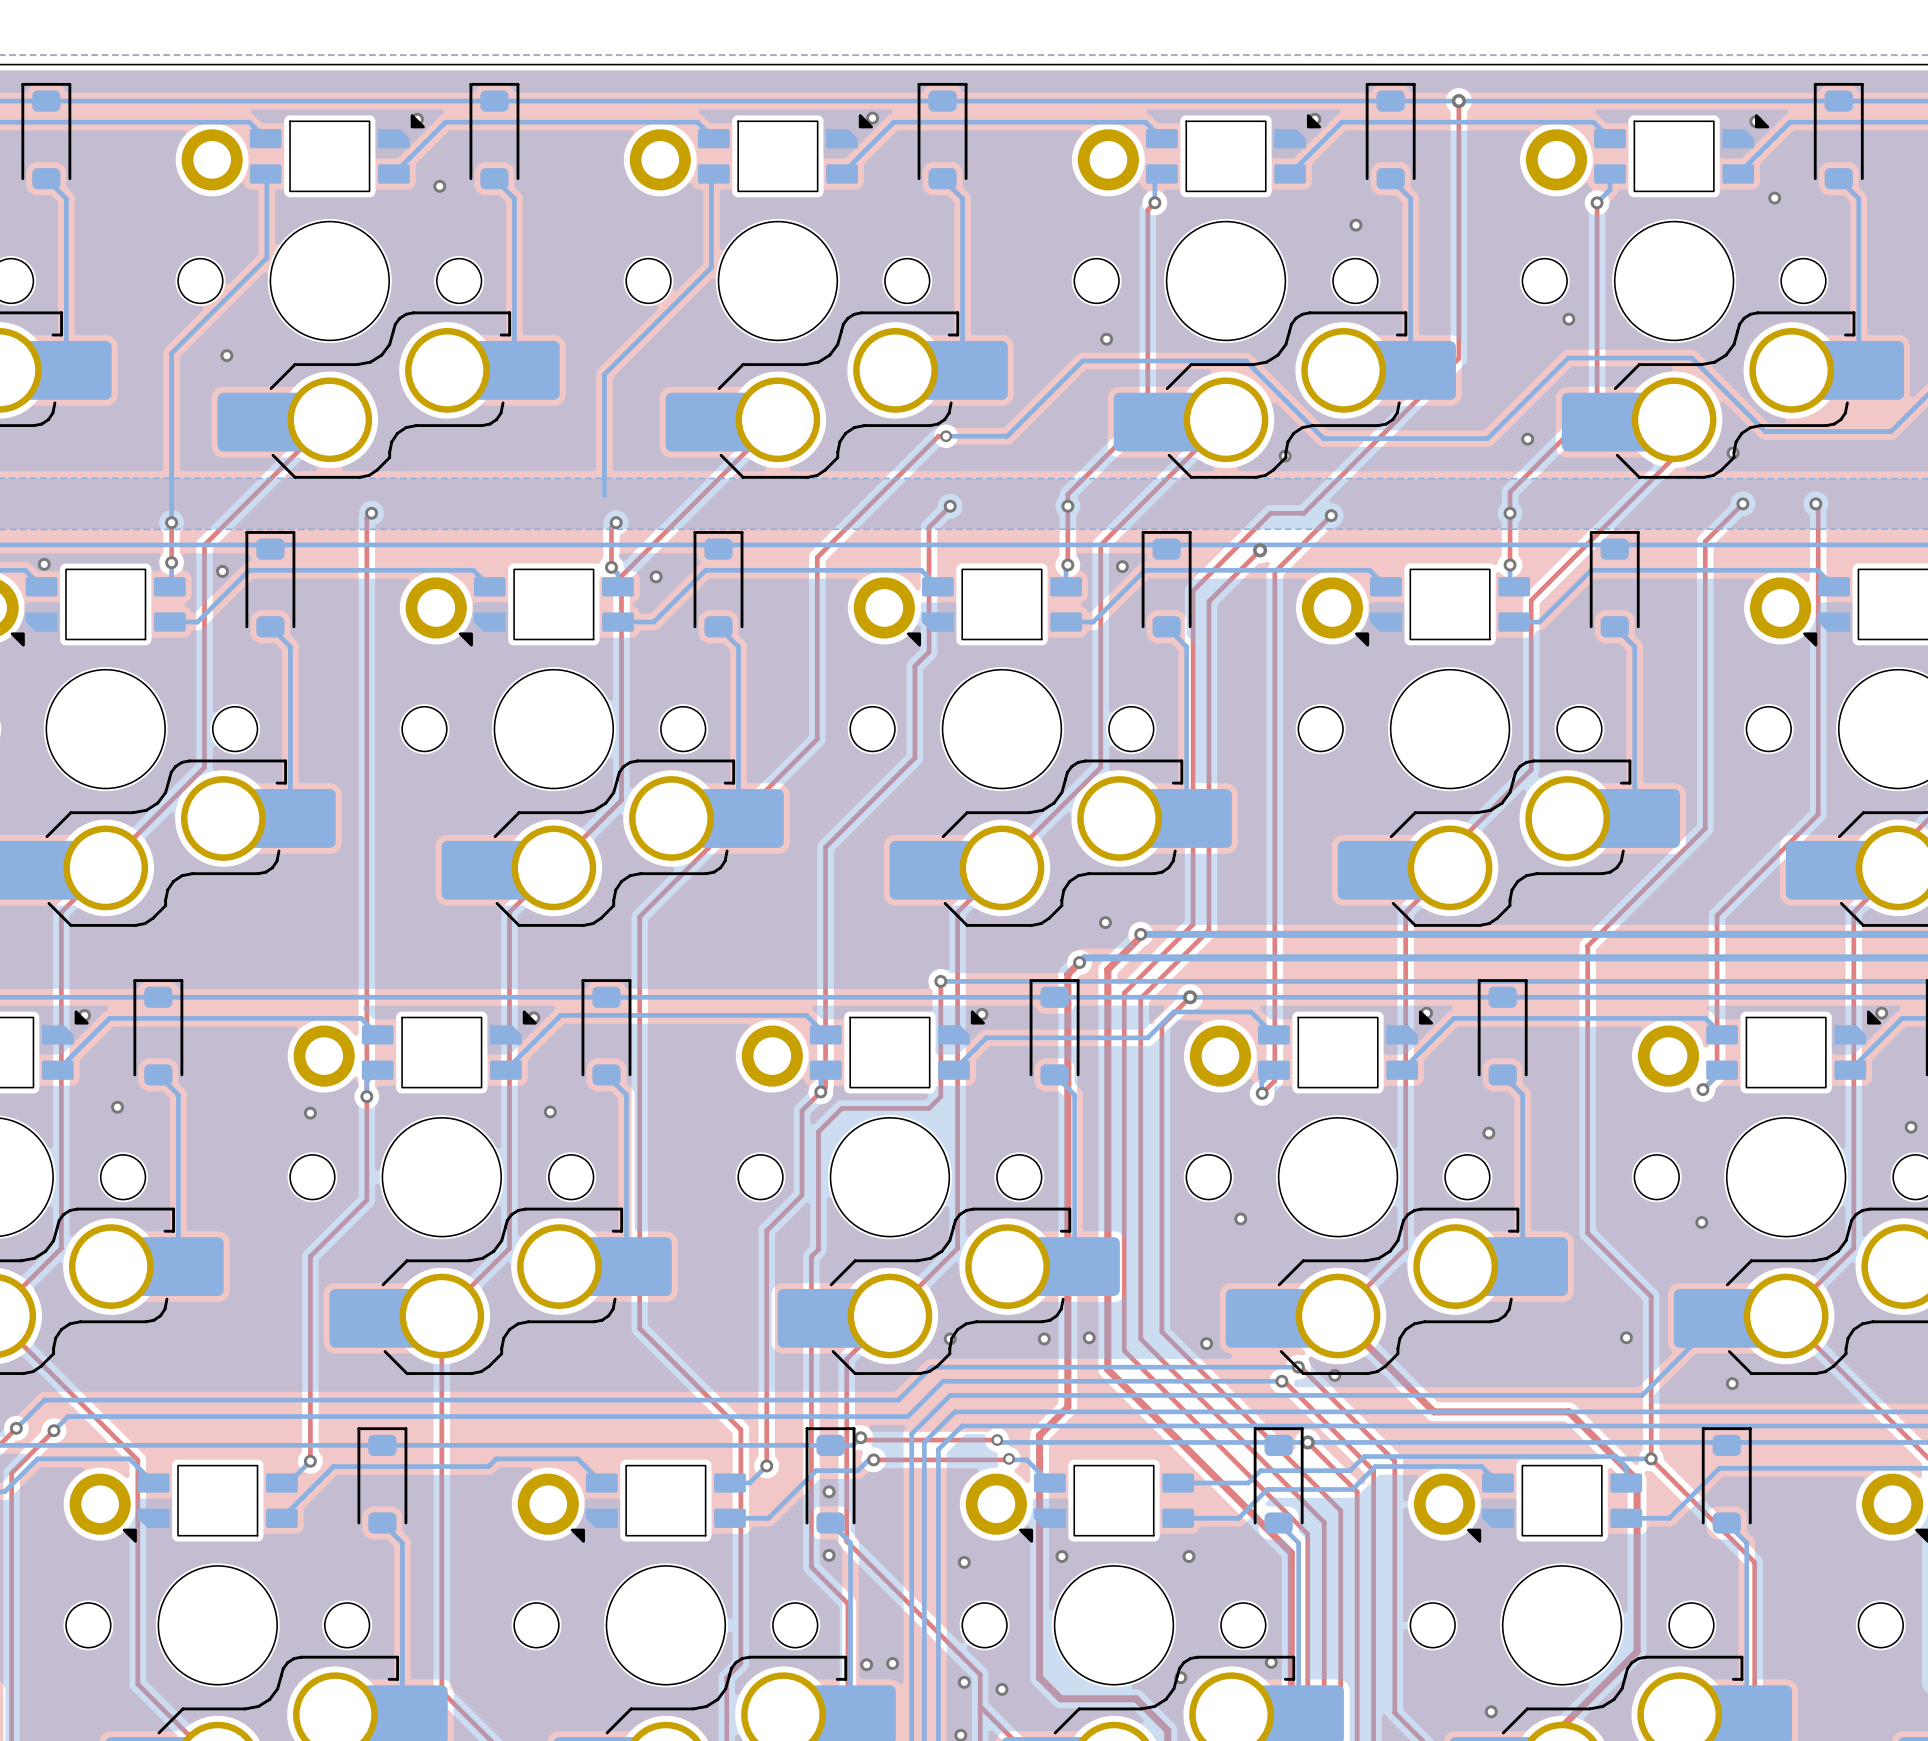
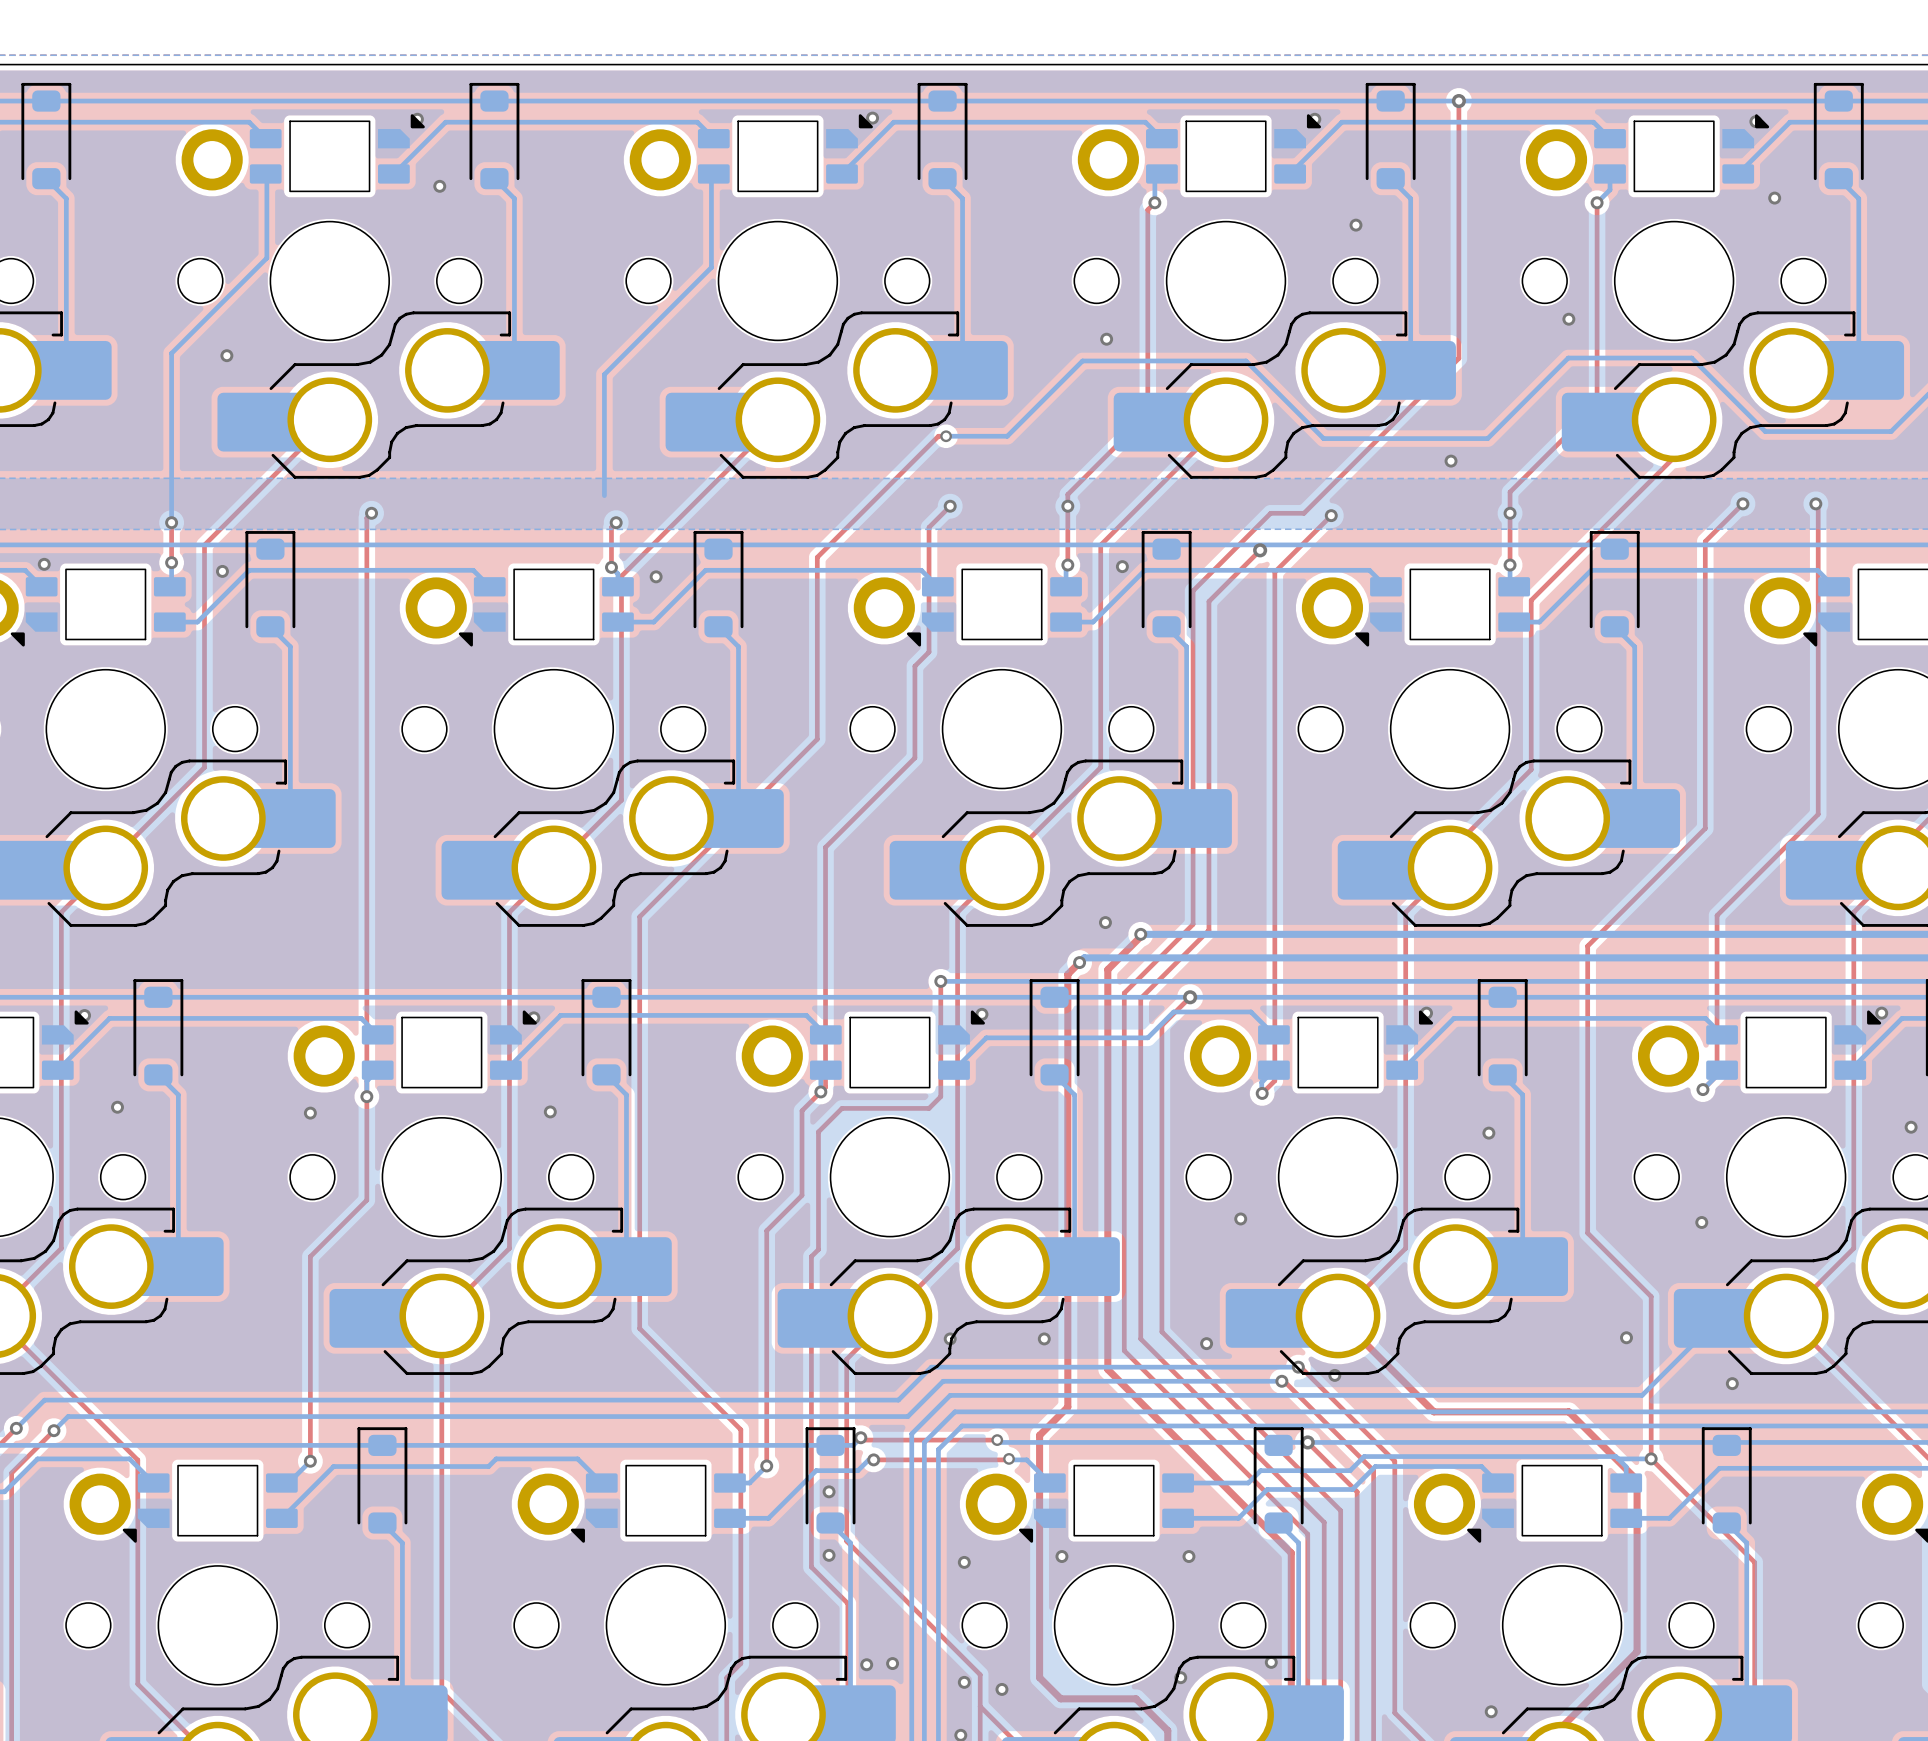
via position: (1527, 439) -> (1451, 461)
via: (1733, 453) -> none
via: (1285, 456) -> none
via: (1089, 1337) -> none

